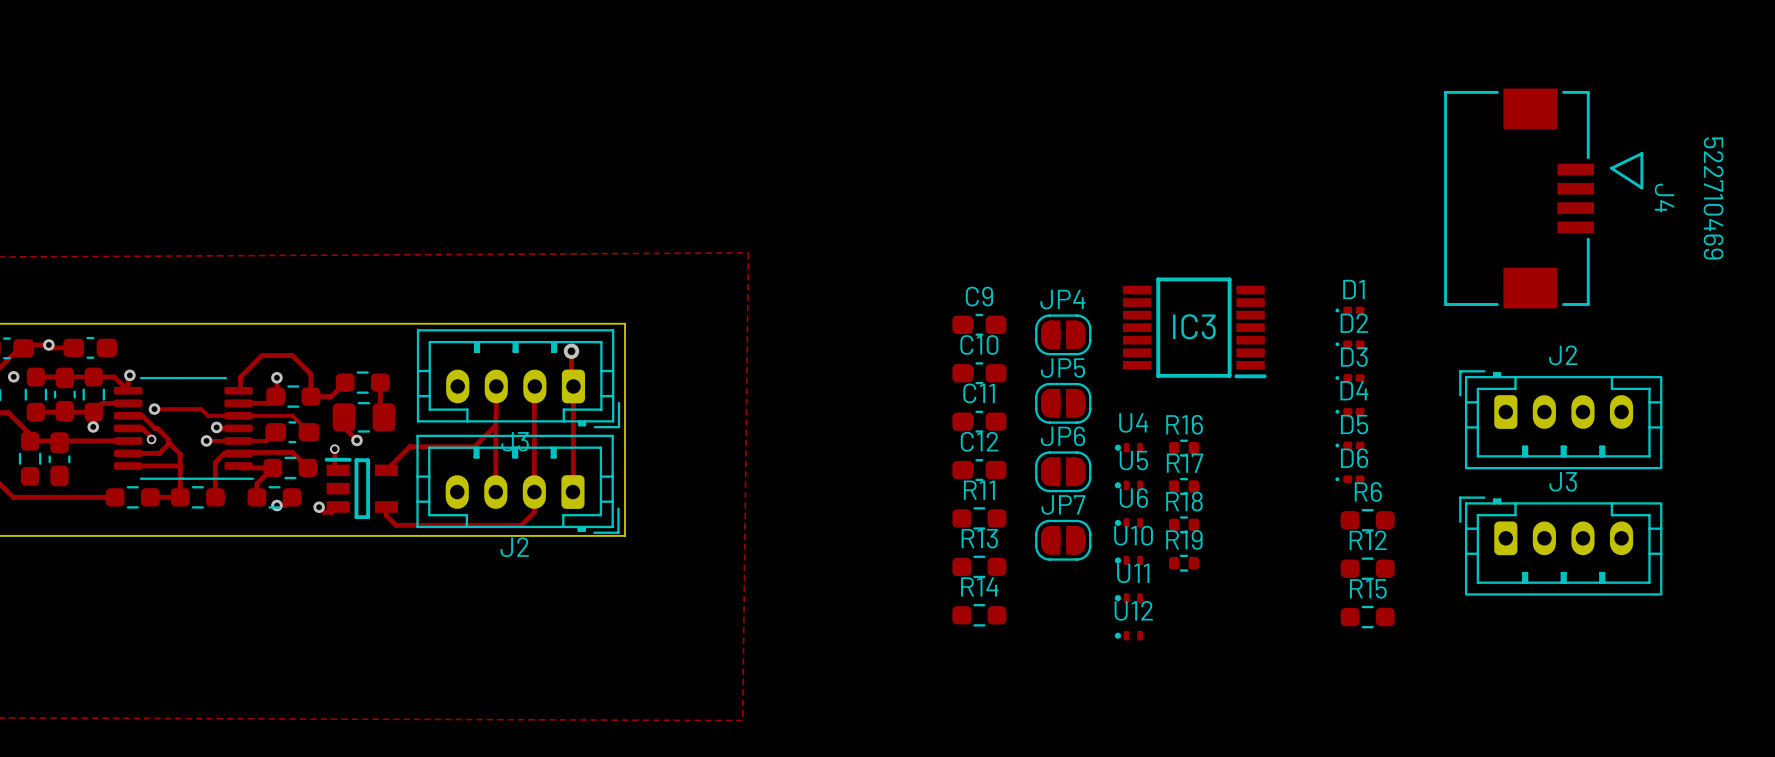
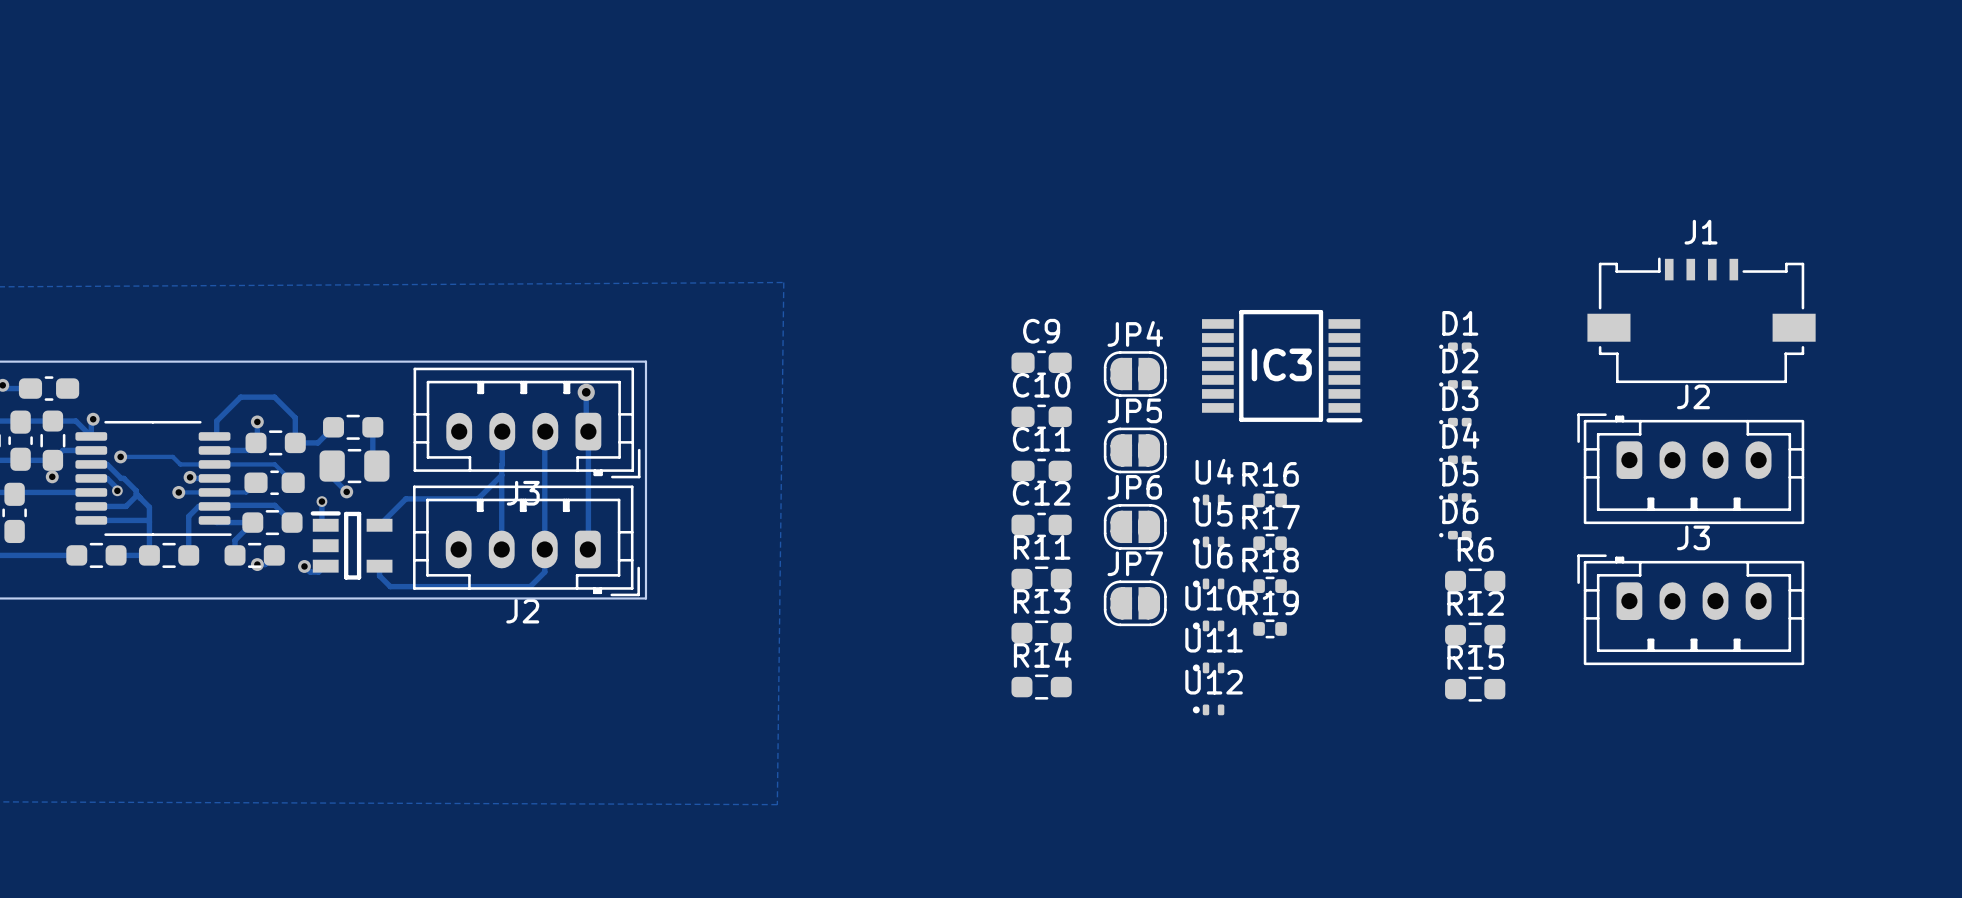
J4: (1543, 198) -> none
J1: none -> (1701, 320)

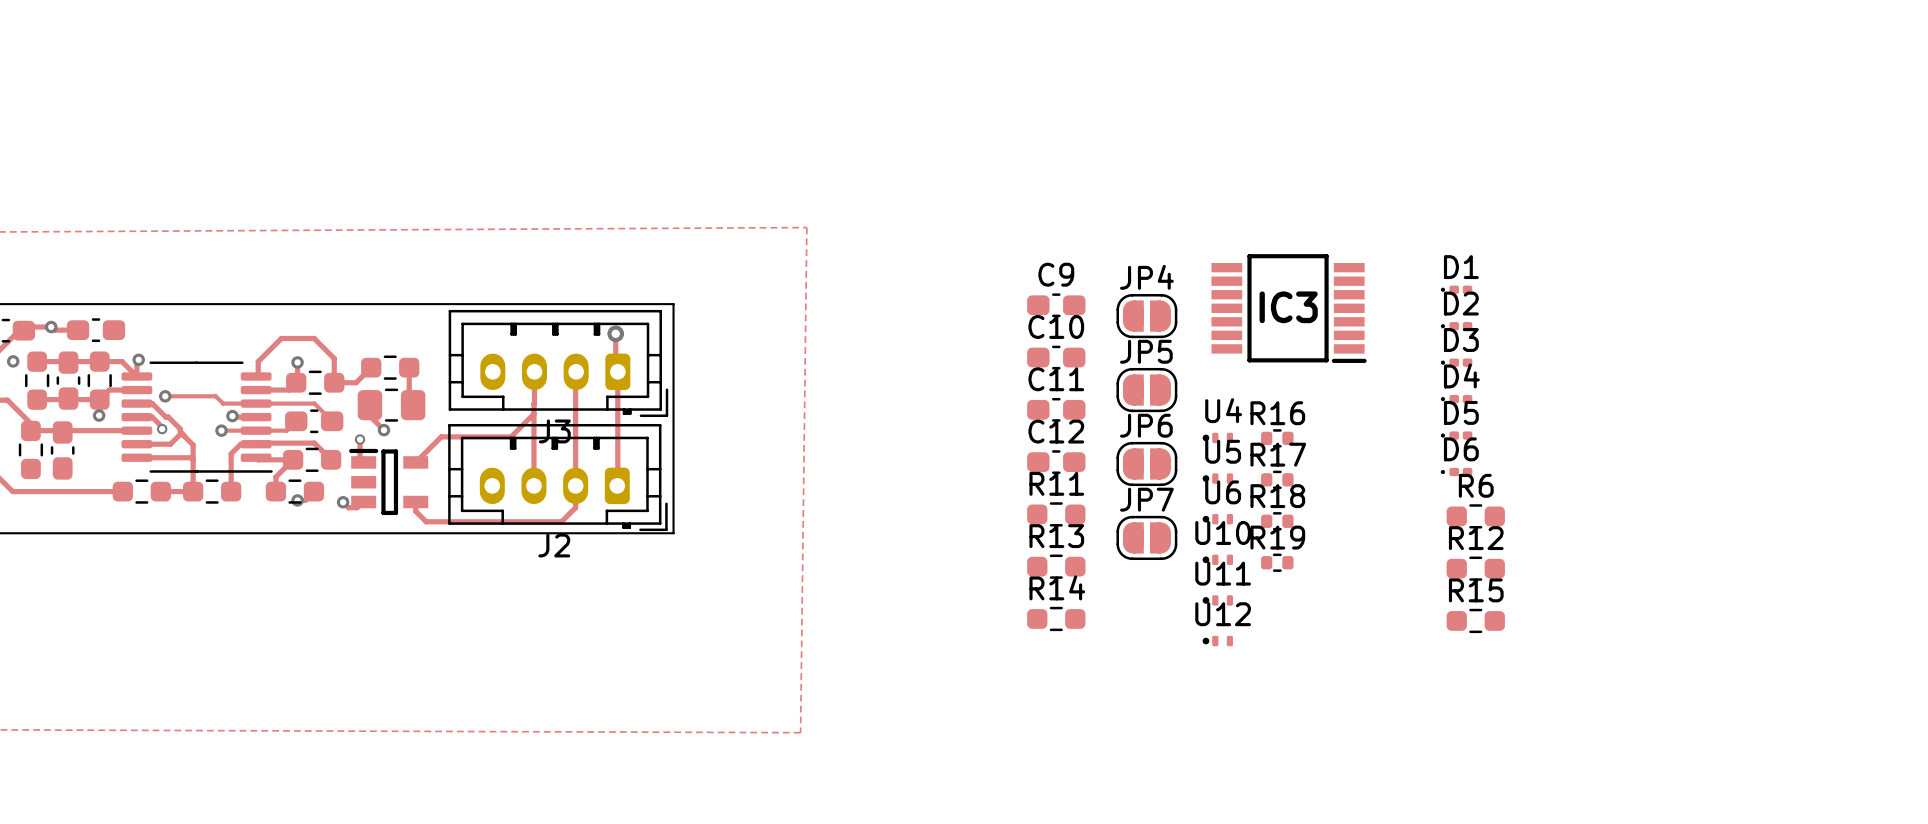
J1: (1701, 320) -> none
J2: (1690, 468) -> none
J3: (1690, 609) -> none

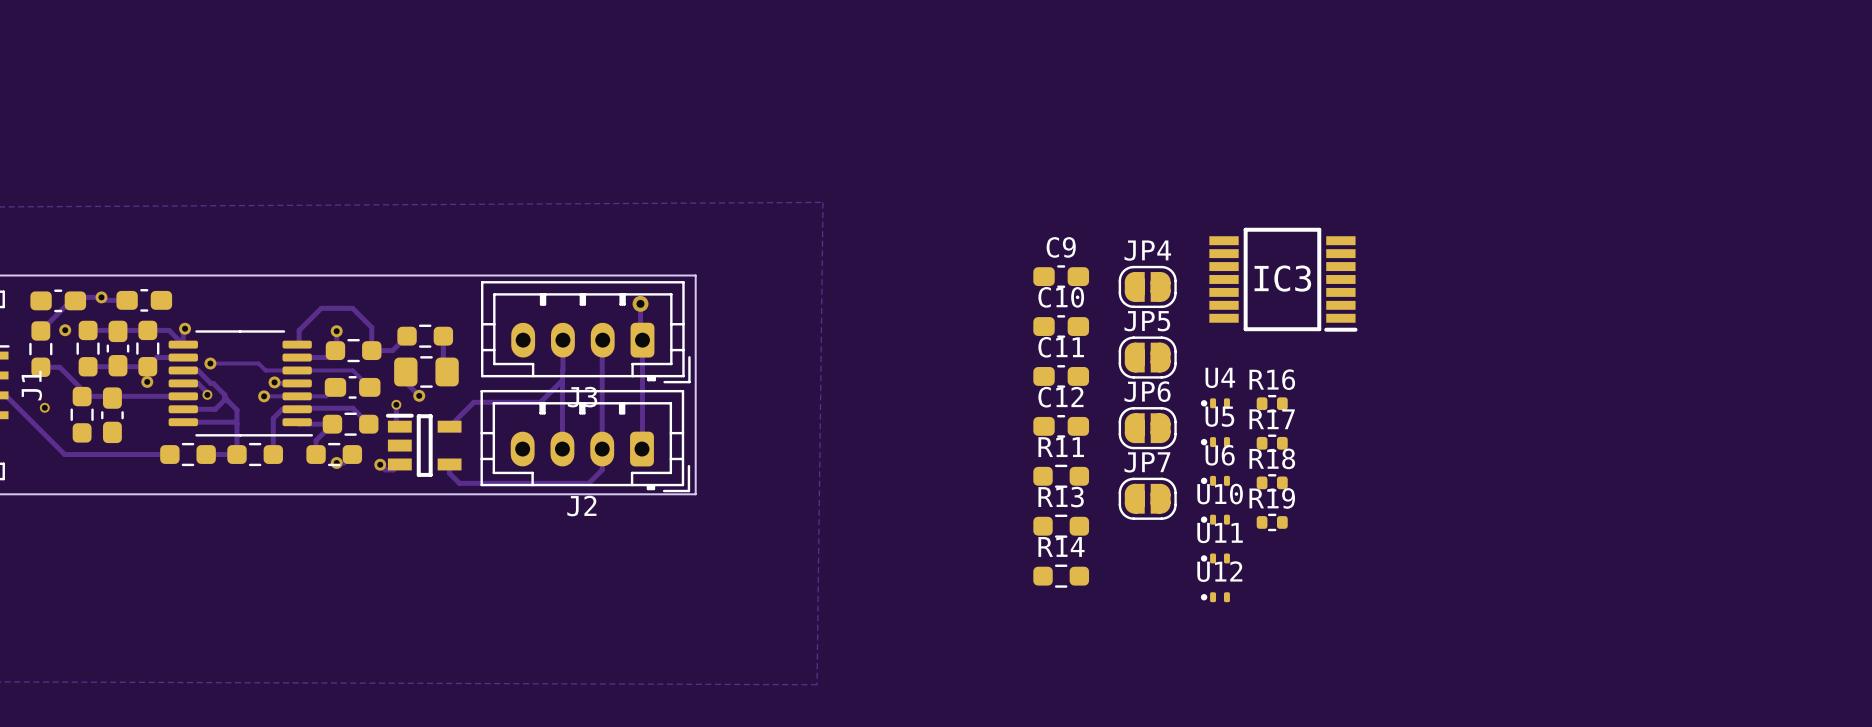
D1: (1456, 289) -> none
D2: (1456, 326) -> none
D3: (1456, 362) -> none
D4: (1456, 399) -> none
D5: (1456, 435) -> none
D6: (1456, 472) -> none
R6: (1475, 516) -> none
R12: (1475, 568) -> none
R15: (1475, 620) -> none

